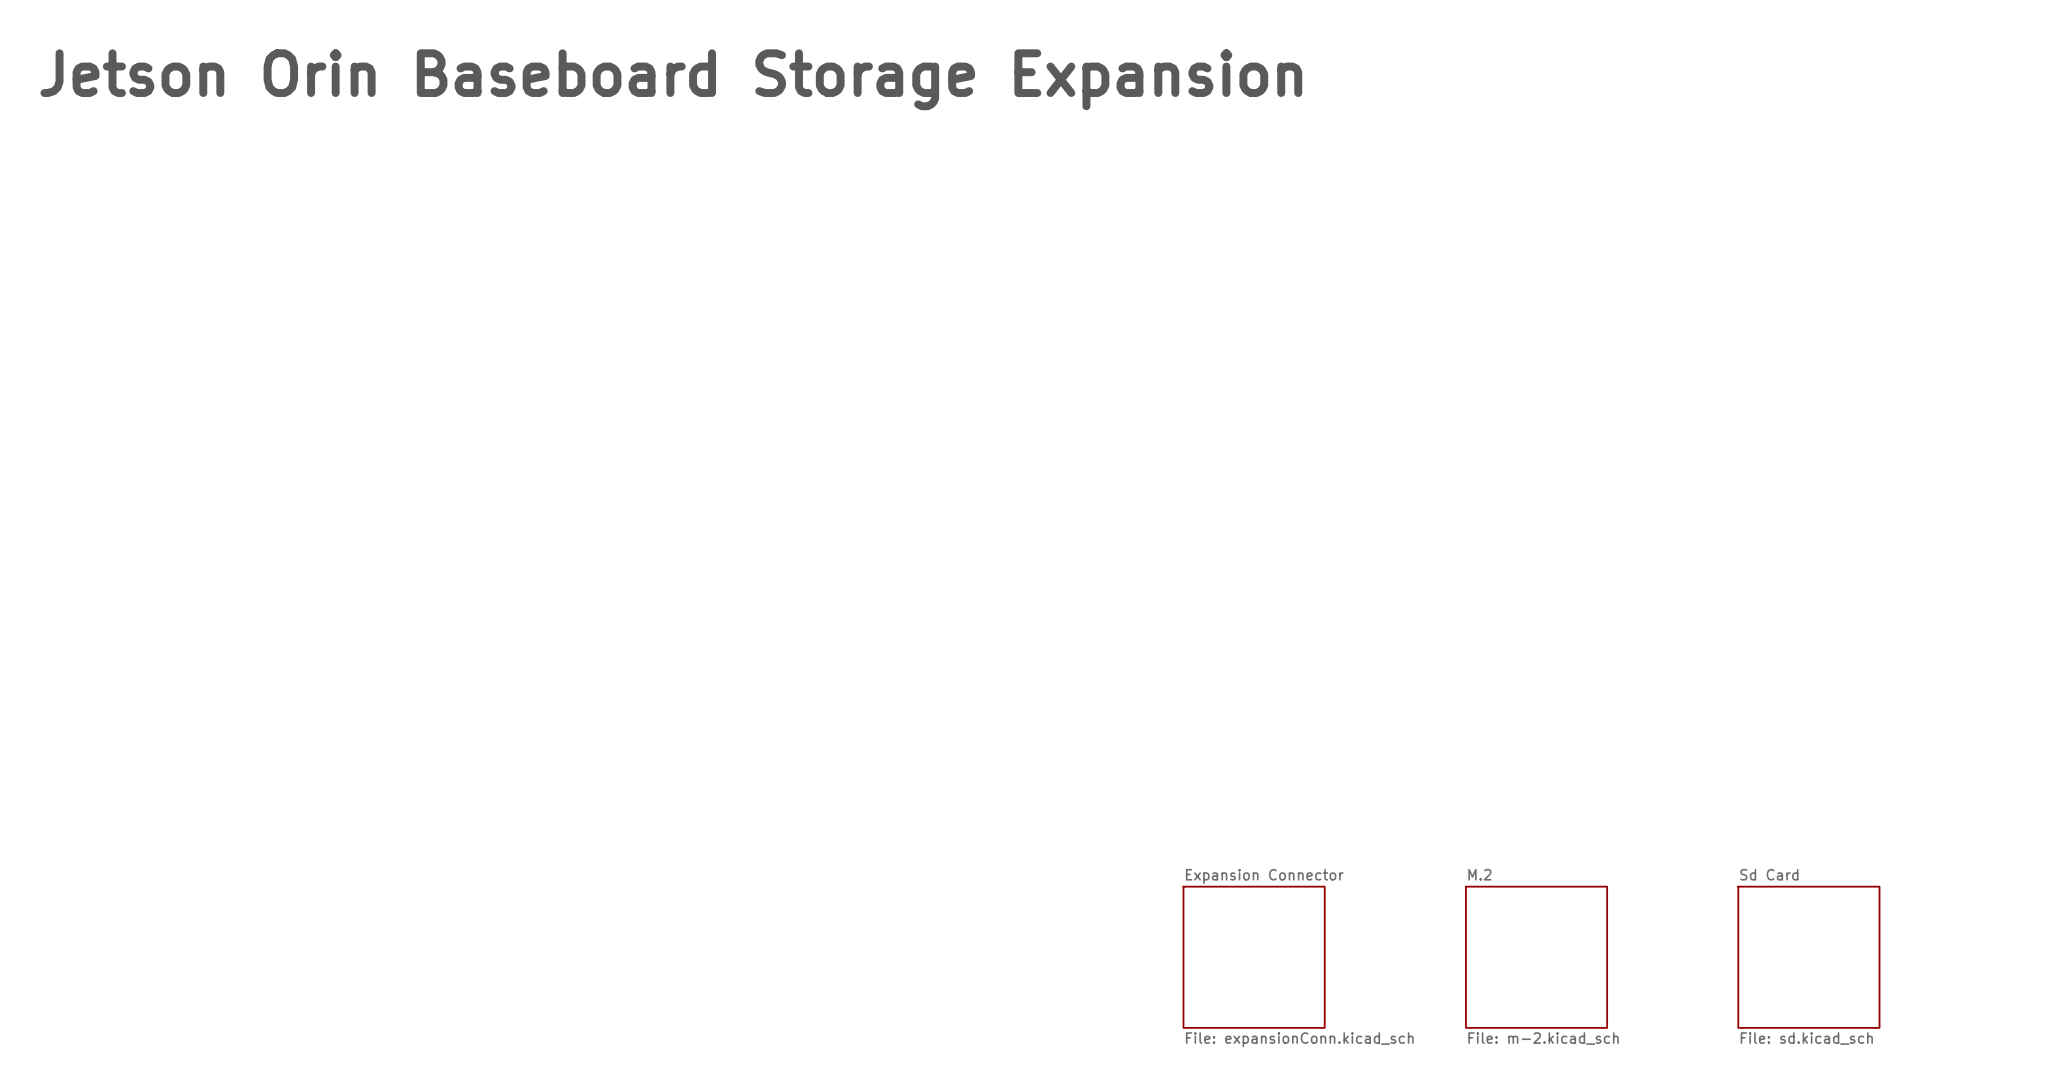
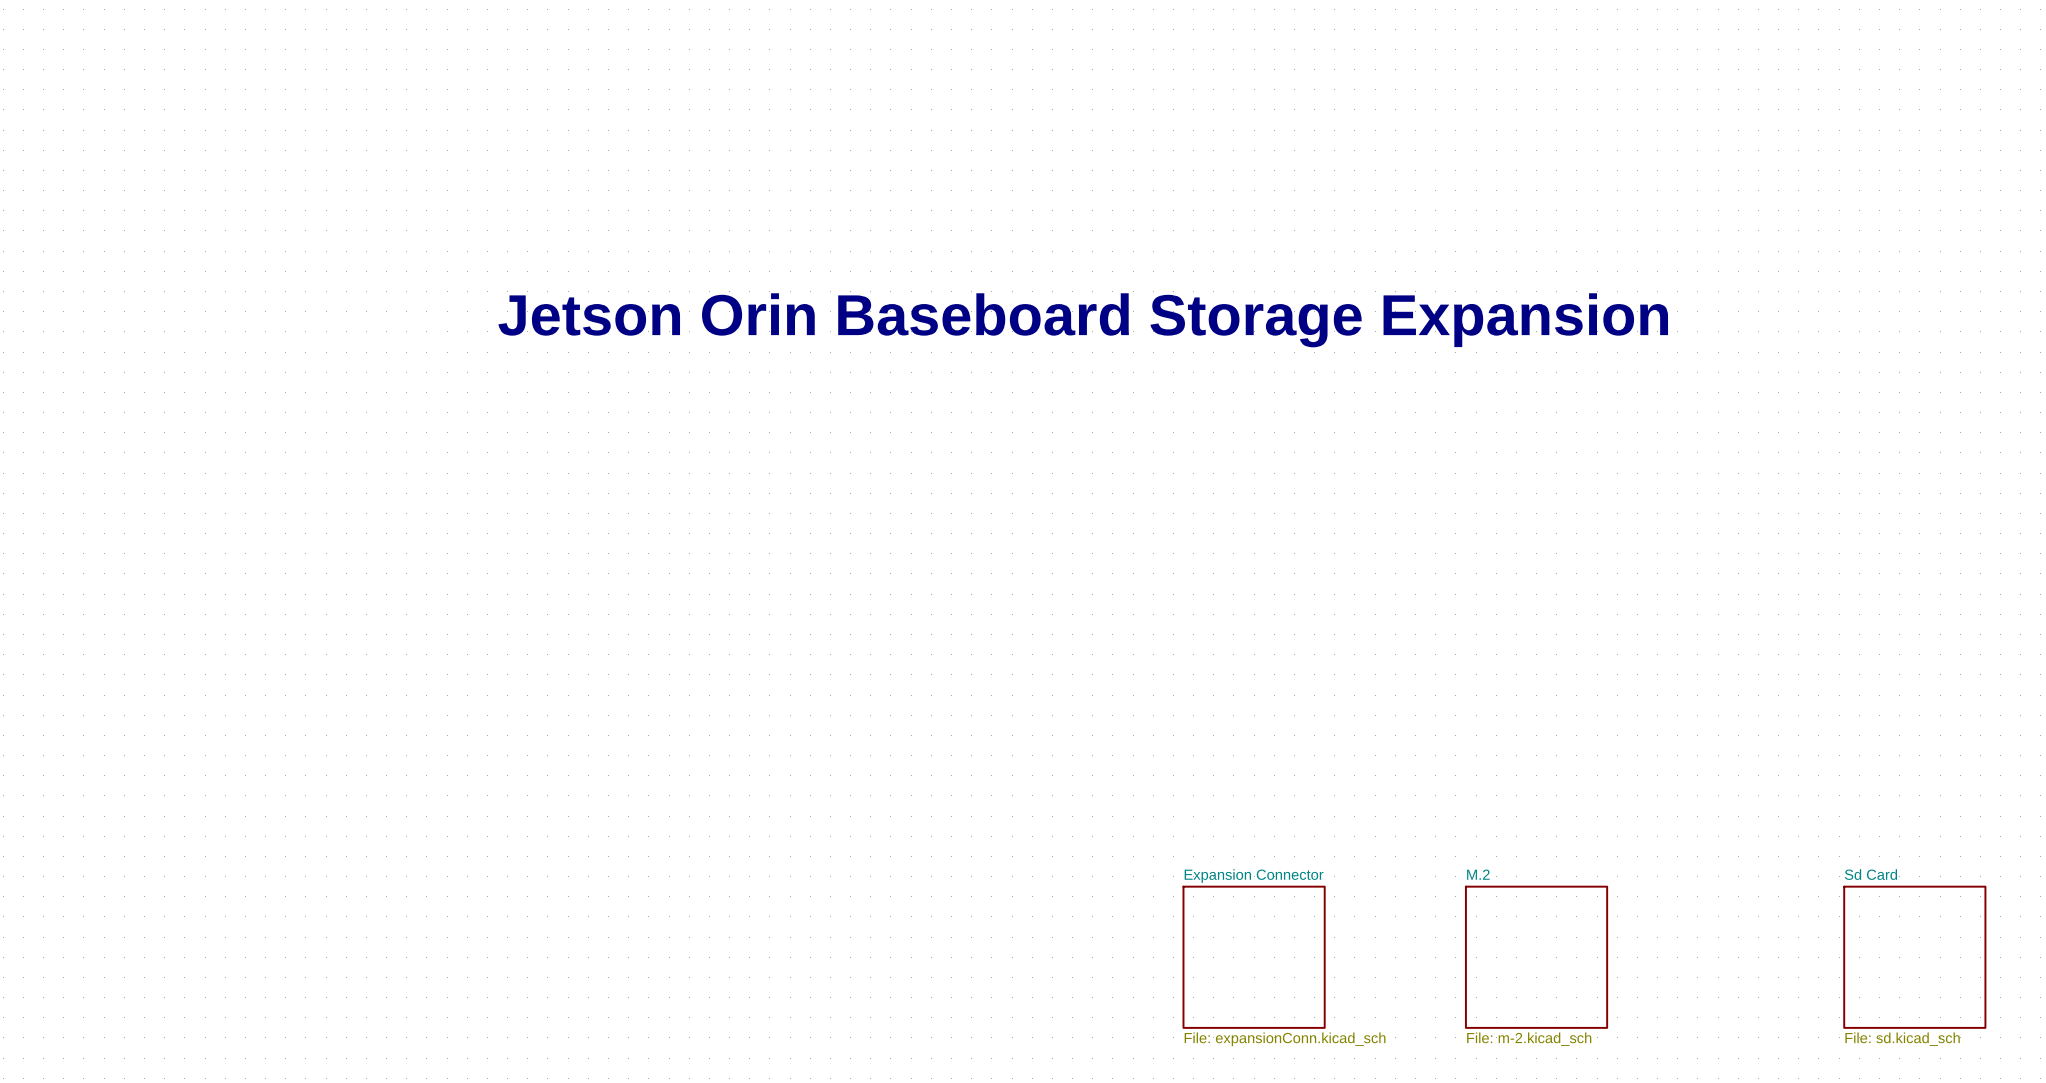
text: Jetson Orin Baseboard Storage Expansion (671, 79) -> none
text: none -> Jetson Orin Baseboard Storage Expansion (1083, 320)
sheet Sd Card position: (1808, 957) -> (1914, 957)

